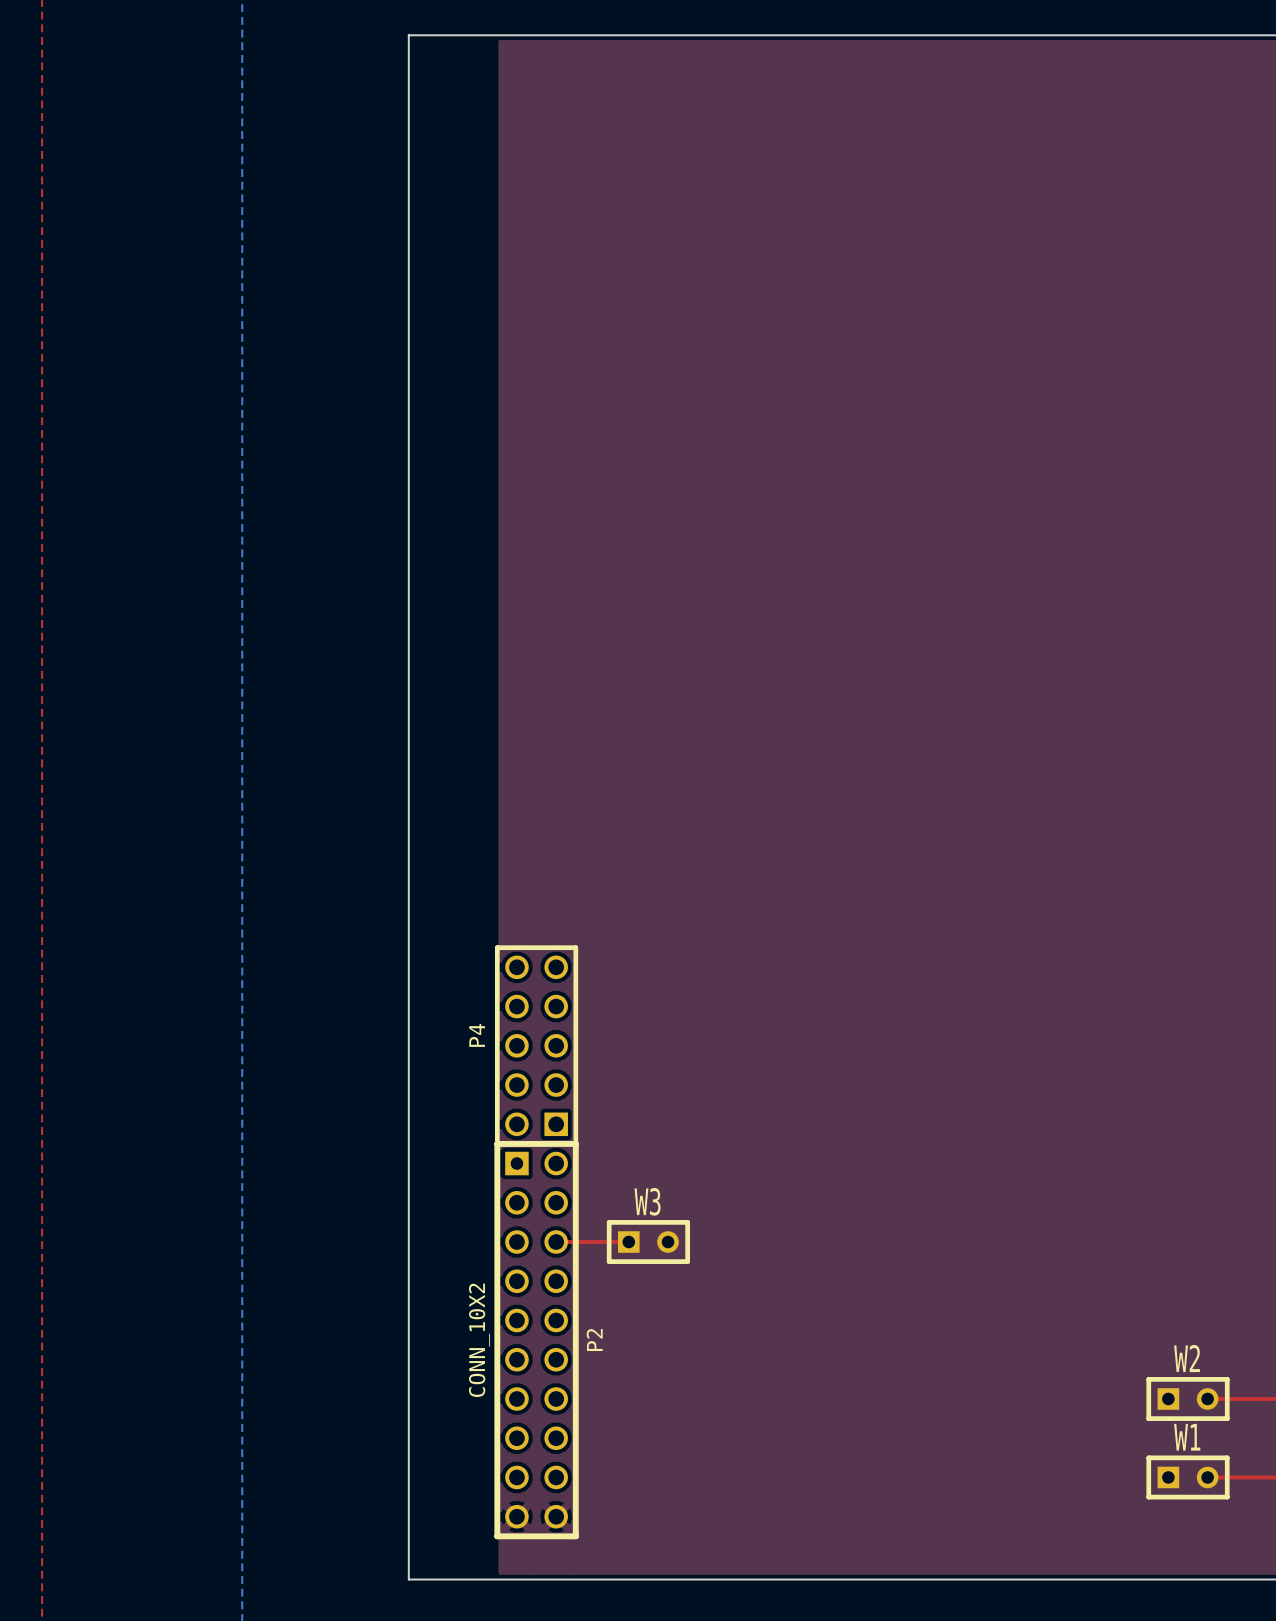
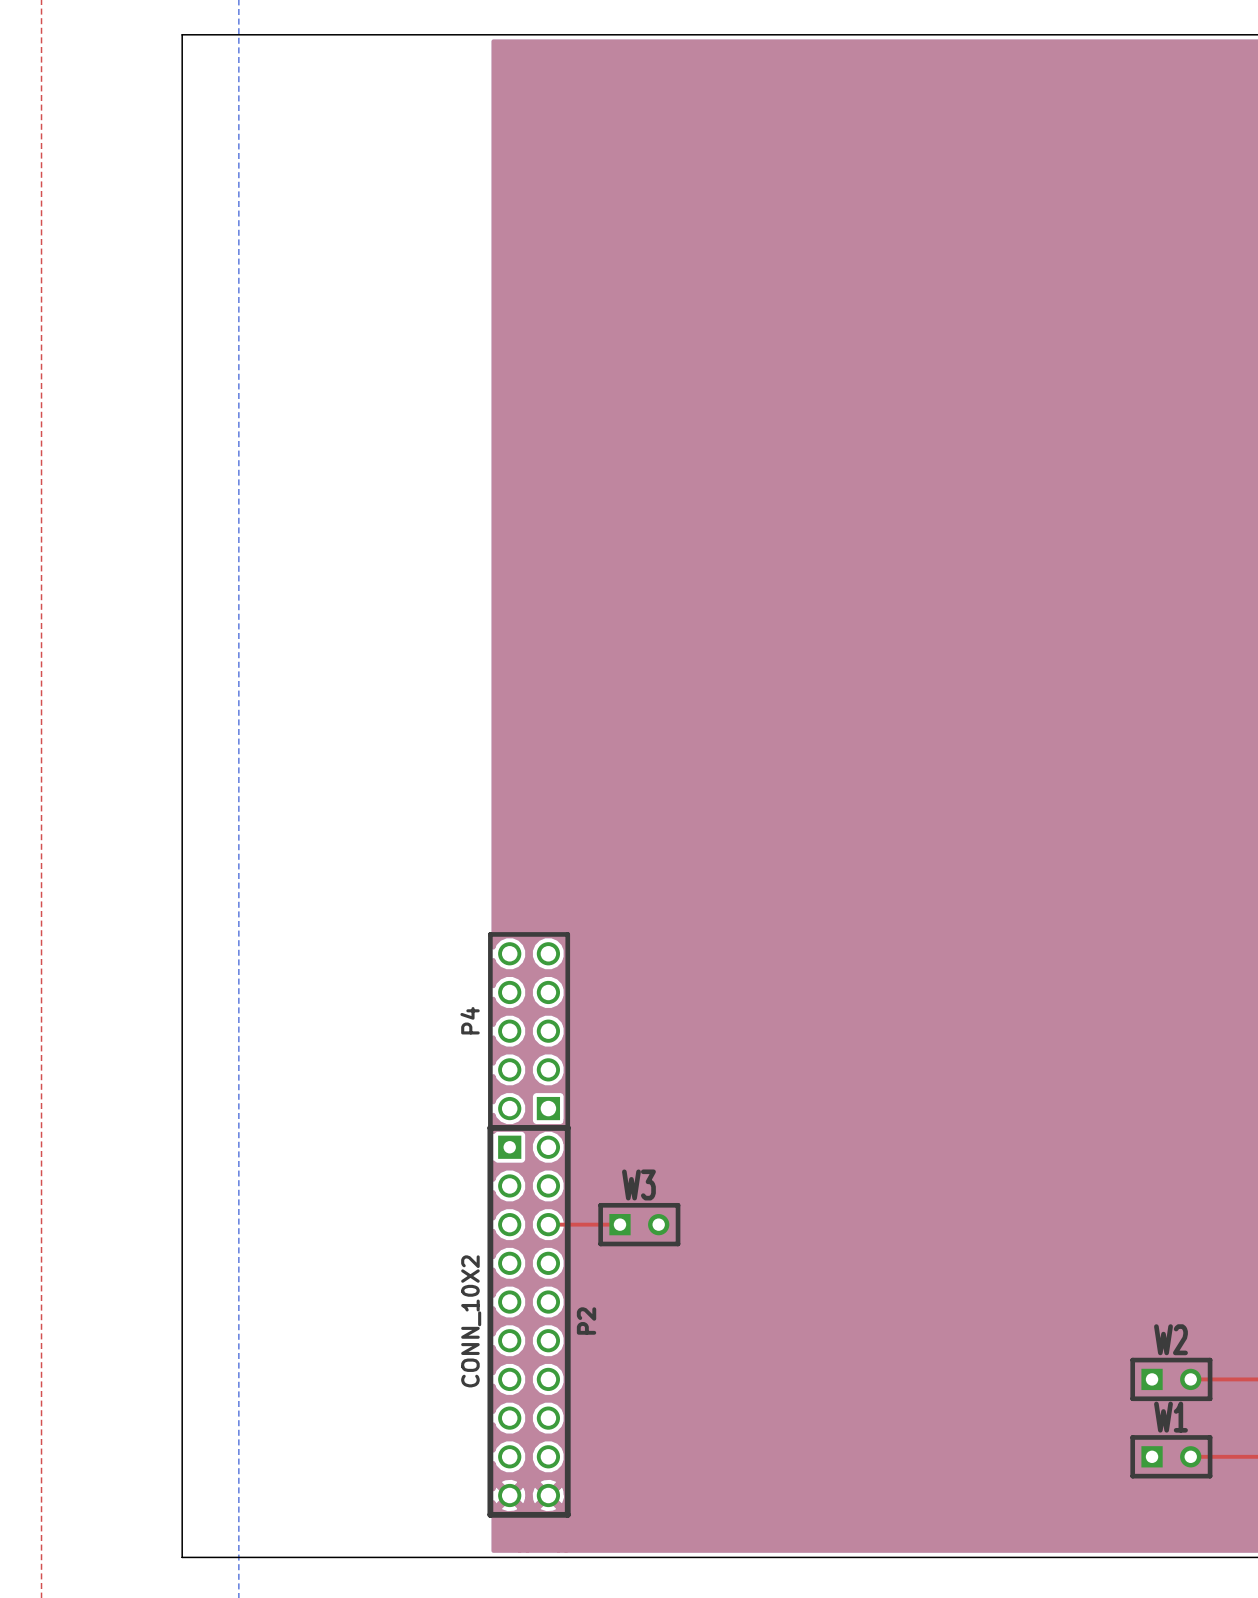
board edge: (408, 35) (408, 1579) -> (403, 34) (182, 34) (182, 1557) (403, 1557)

